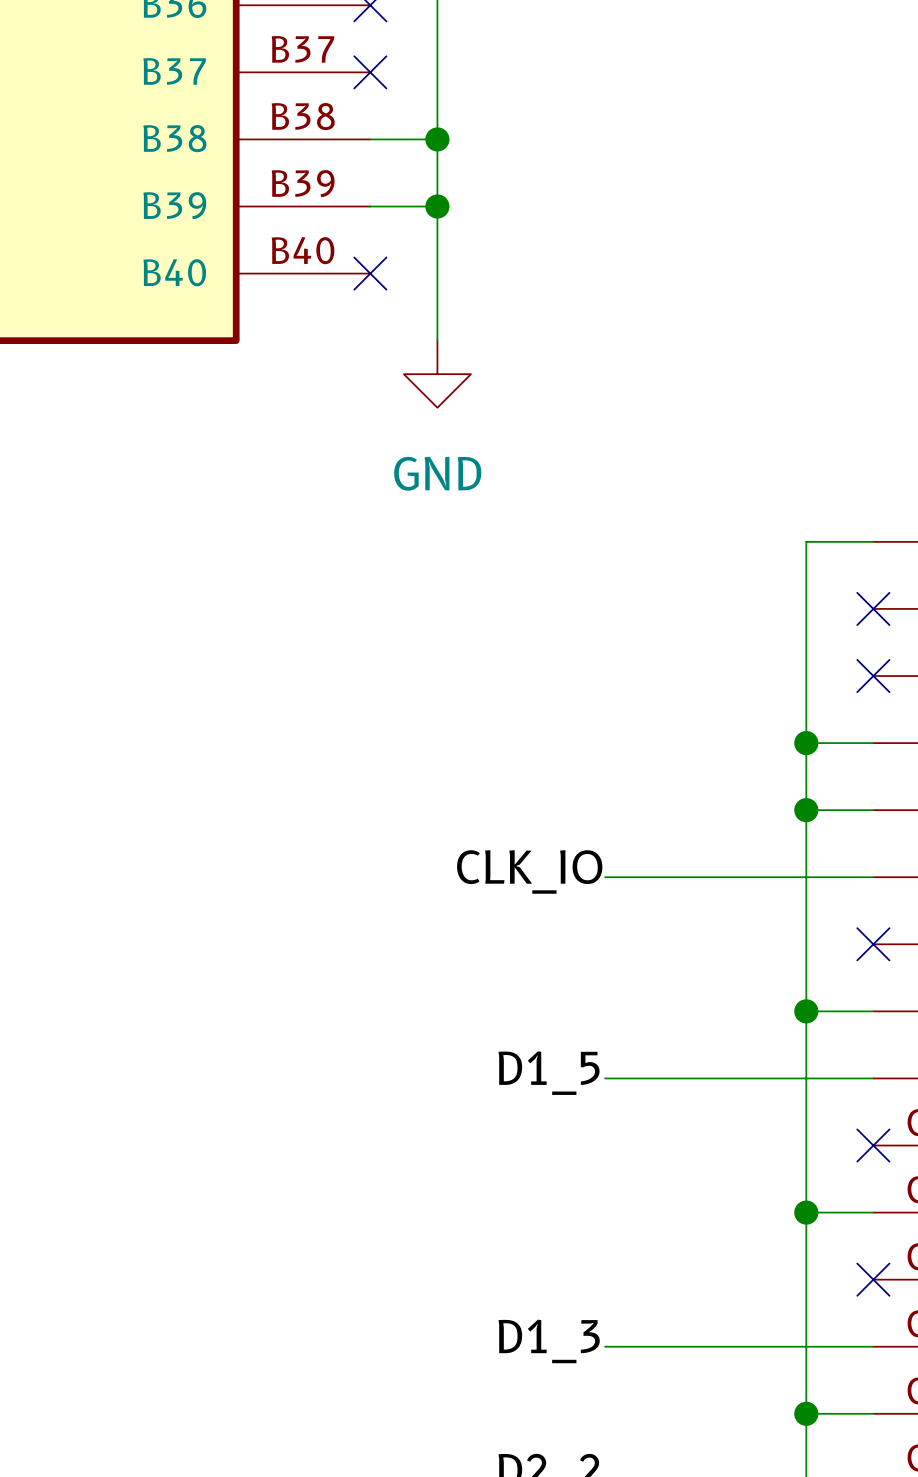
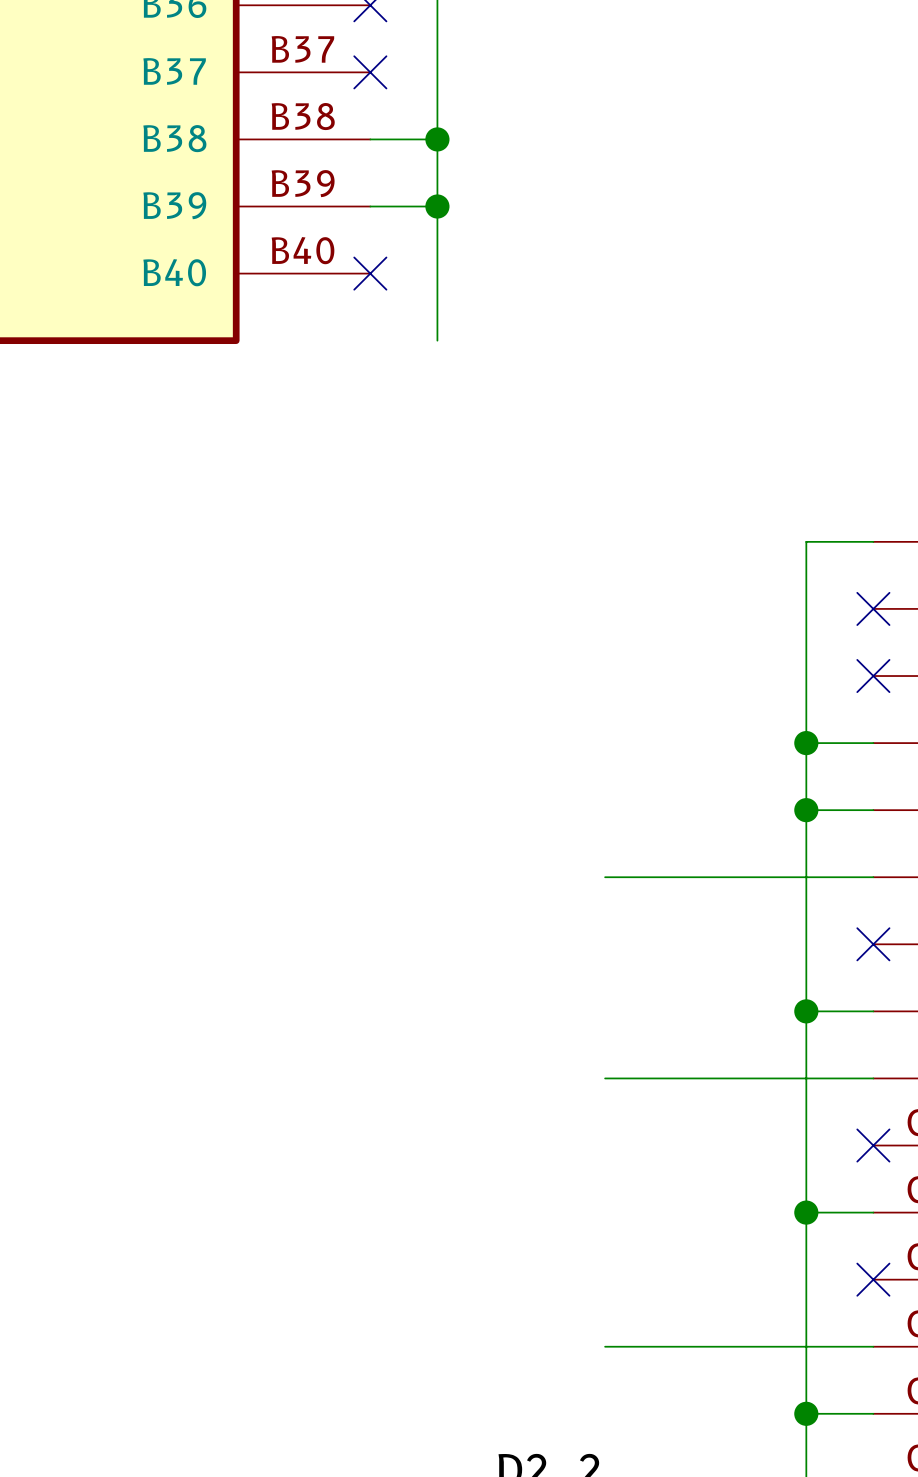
power symbol: GND (437, 374) -> none
label: CLK_IO (529, 871) -> none
label: D1_5 (549, 1073) -> none
label: D1_3 (549, 1341) -> none

